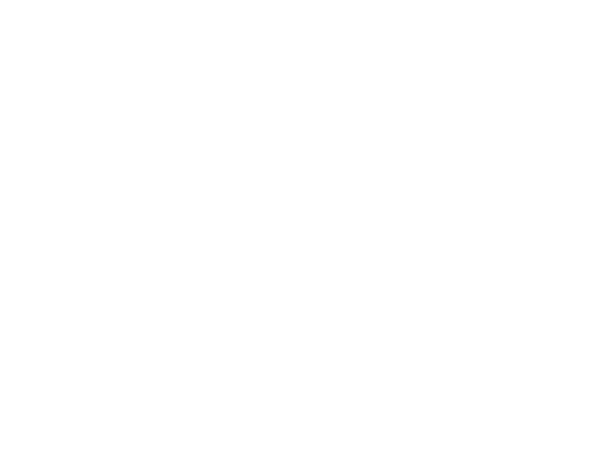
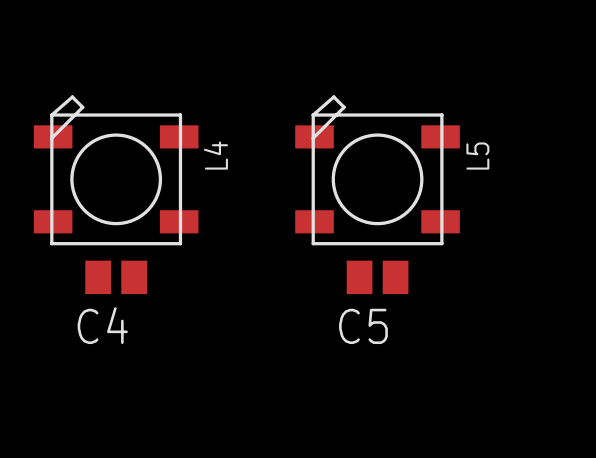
L4: none -> (116, 170)
L5: none -> (377, 170)
C4: none -> (116, 277)
C5: none -> (377, 277)

